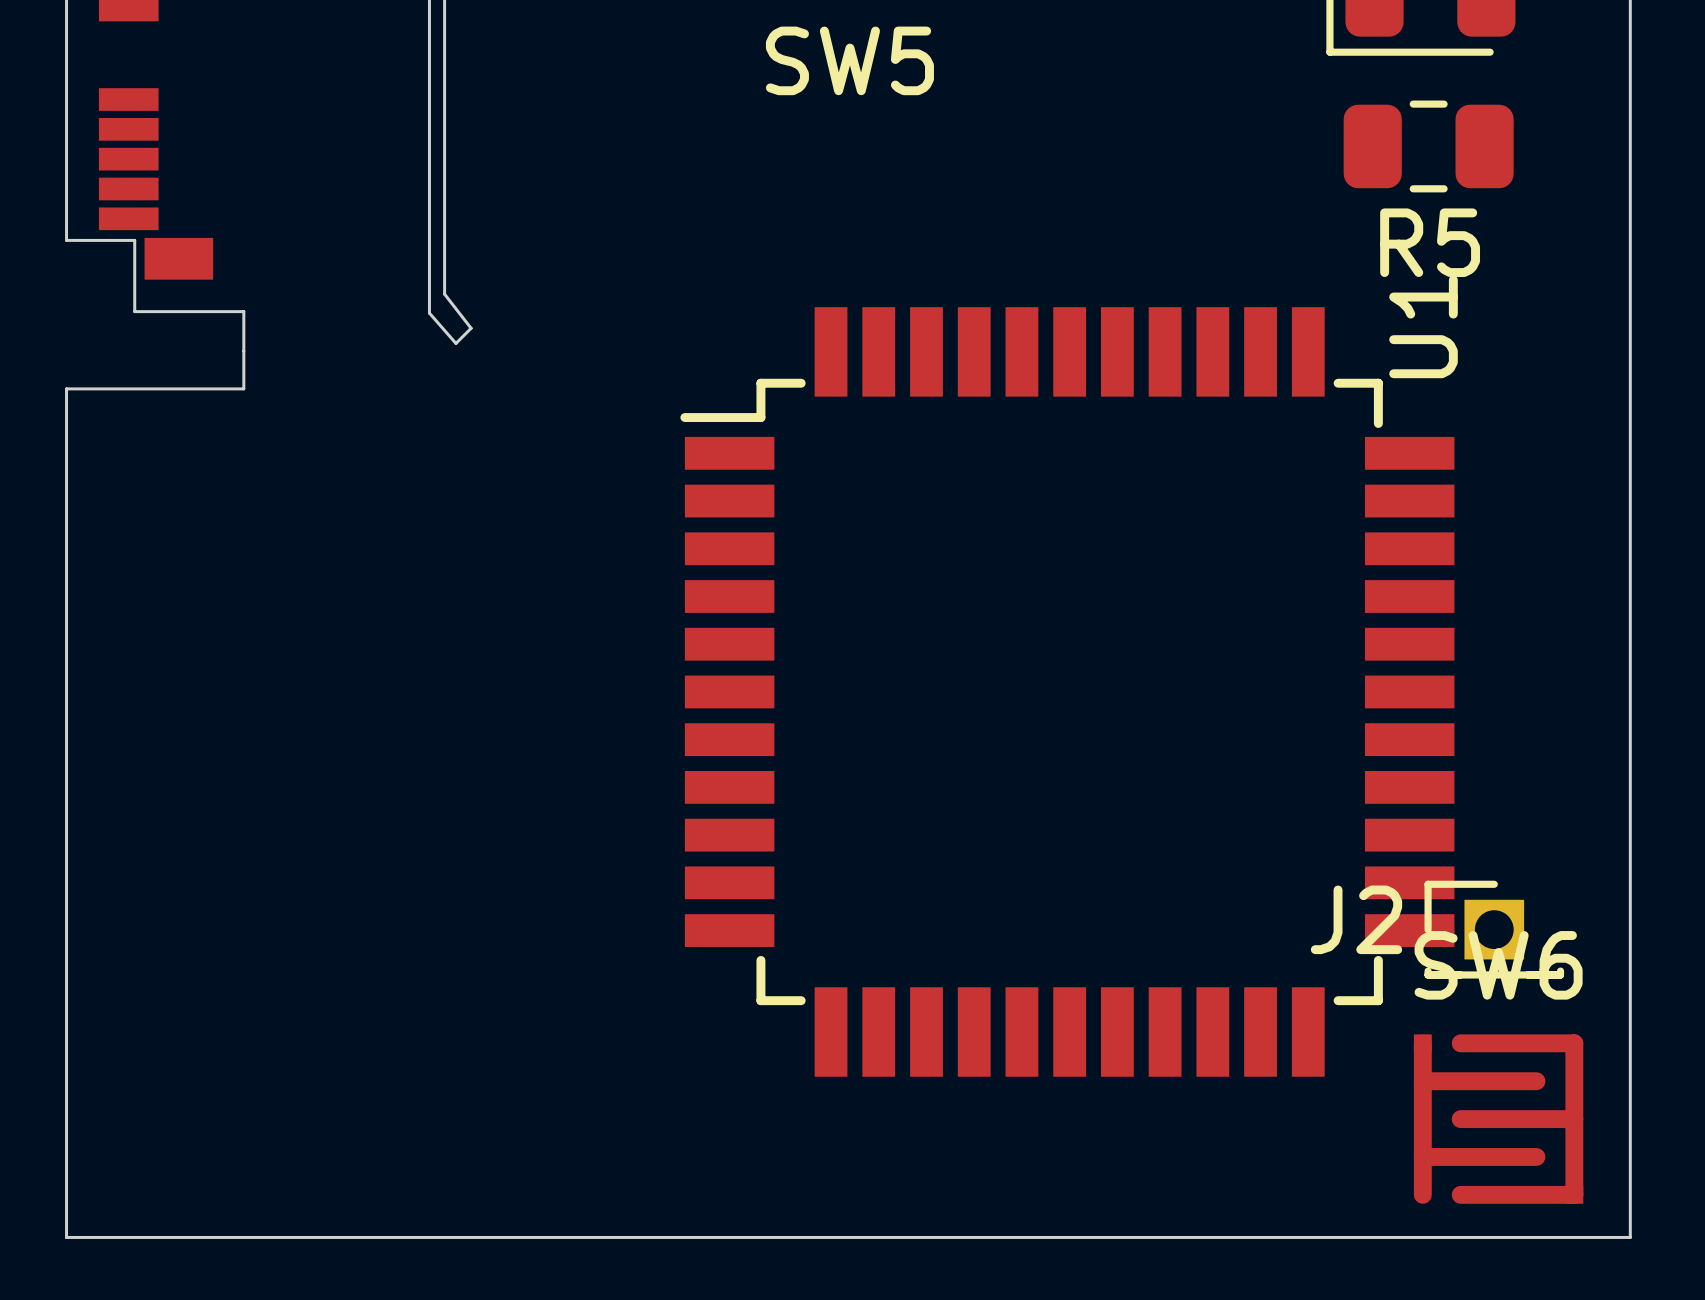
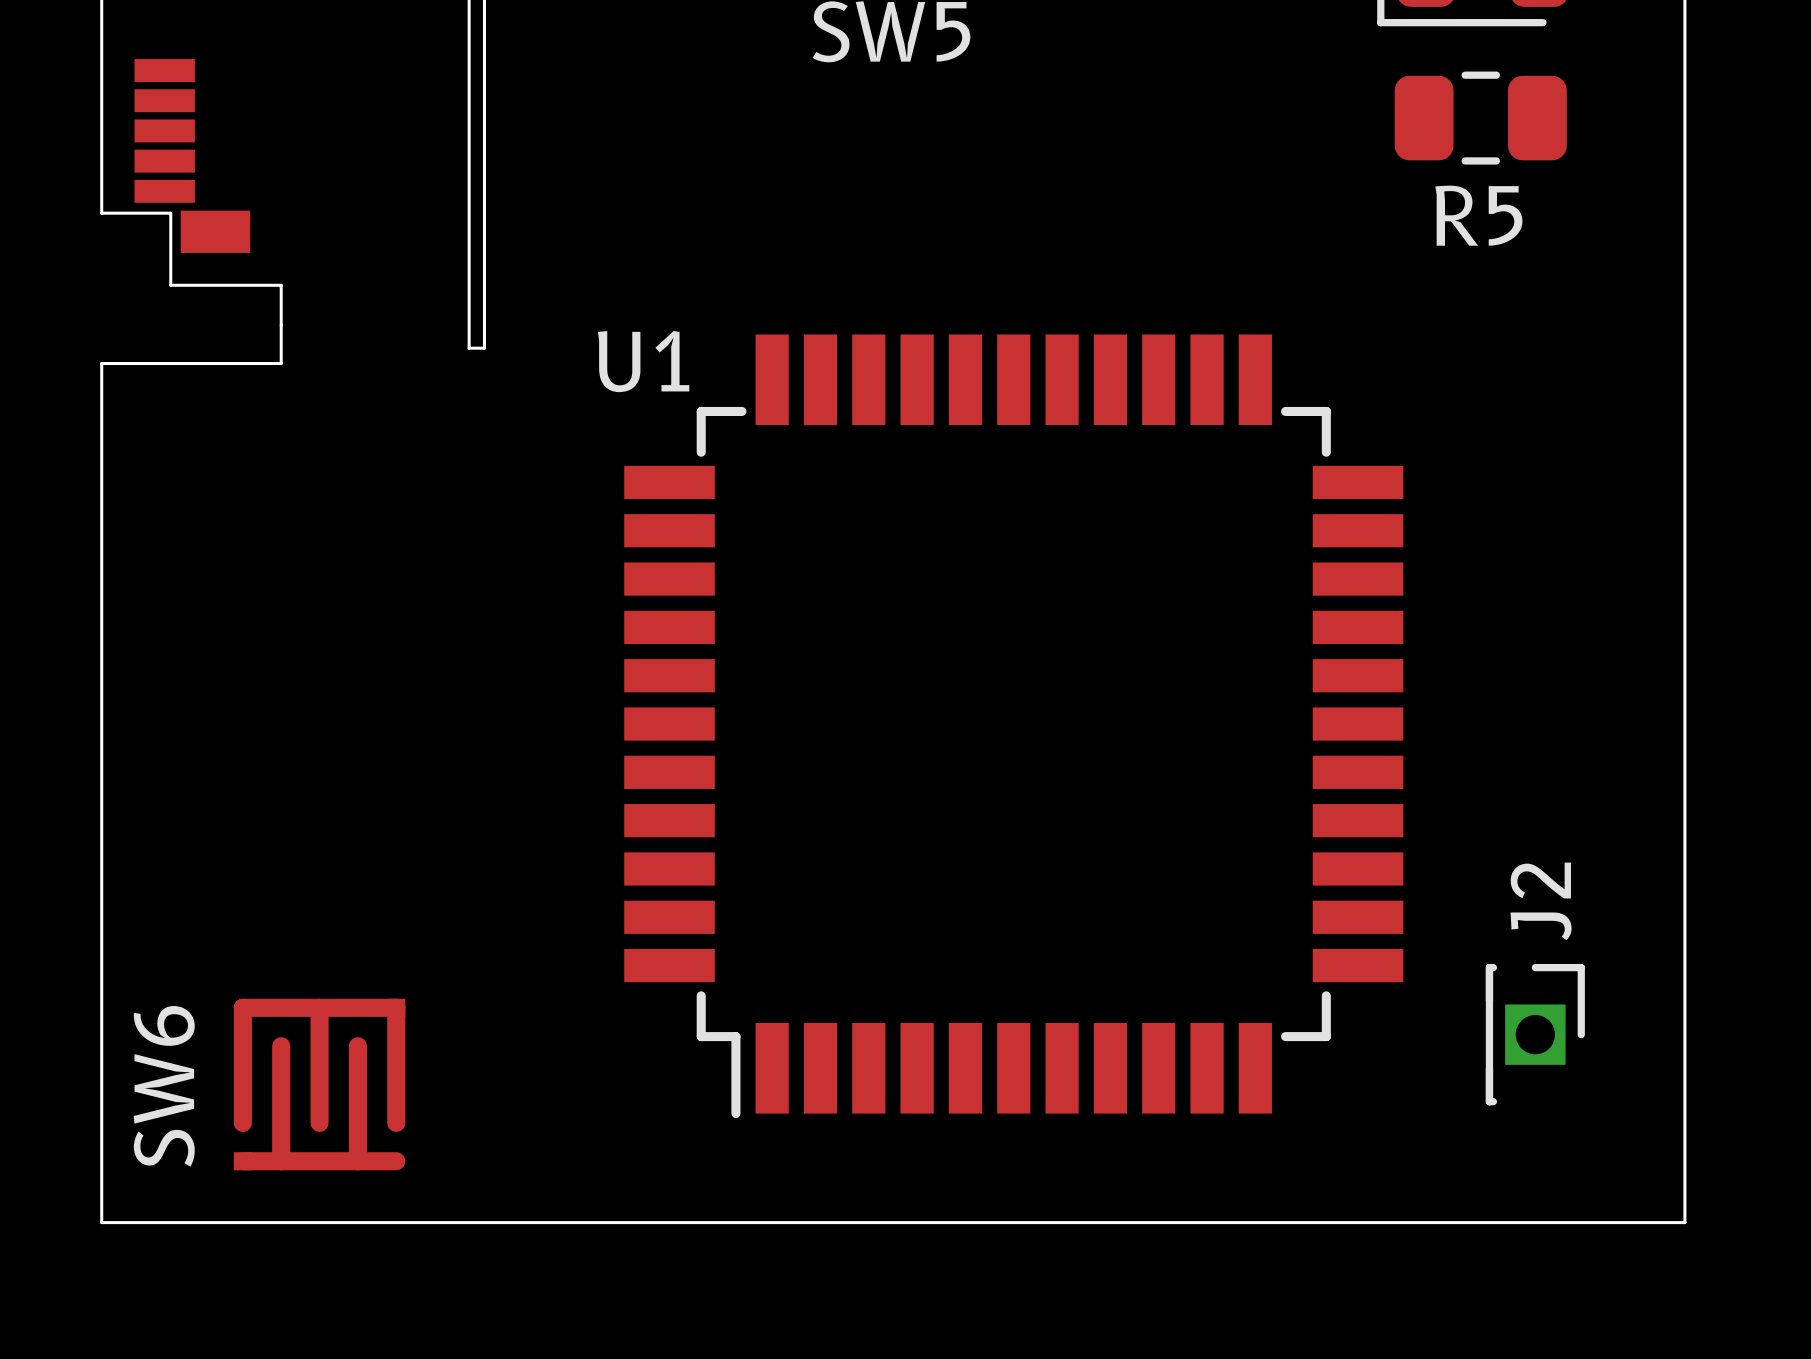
board edge: (444, 294) (471, 328) (455, 343) (429, 313) -> (484, 267) (484, 348) (469, 348) (469, 286)
U1 rotation: 0° (1067, 691) -> 90° counterclockwise (1013, 726)
J2 rotation: 0° (1494, 929) -> 90° clockwise (1535, 1034)
J2 position: (1494, 929) -> (1535, 1034)
SW6 rotation: 0° (1498, 1119) -> 90° counterclockwise (319, 1084)
SW6 position: (1498, 1119) -> (319, 1084)

